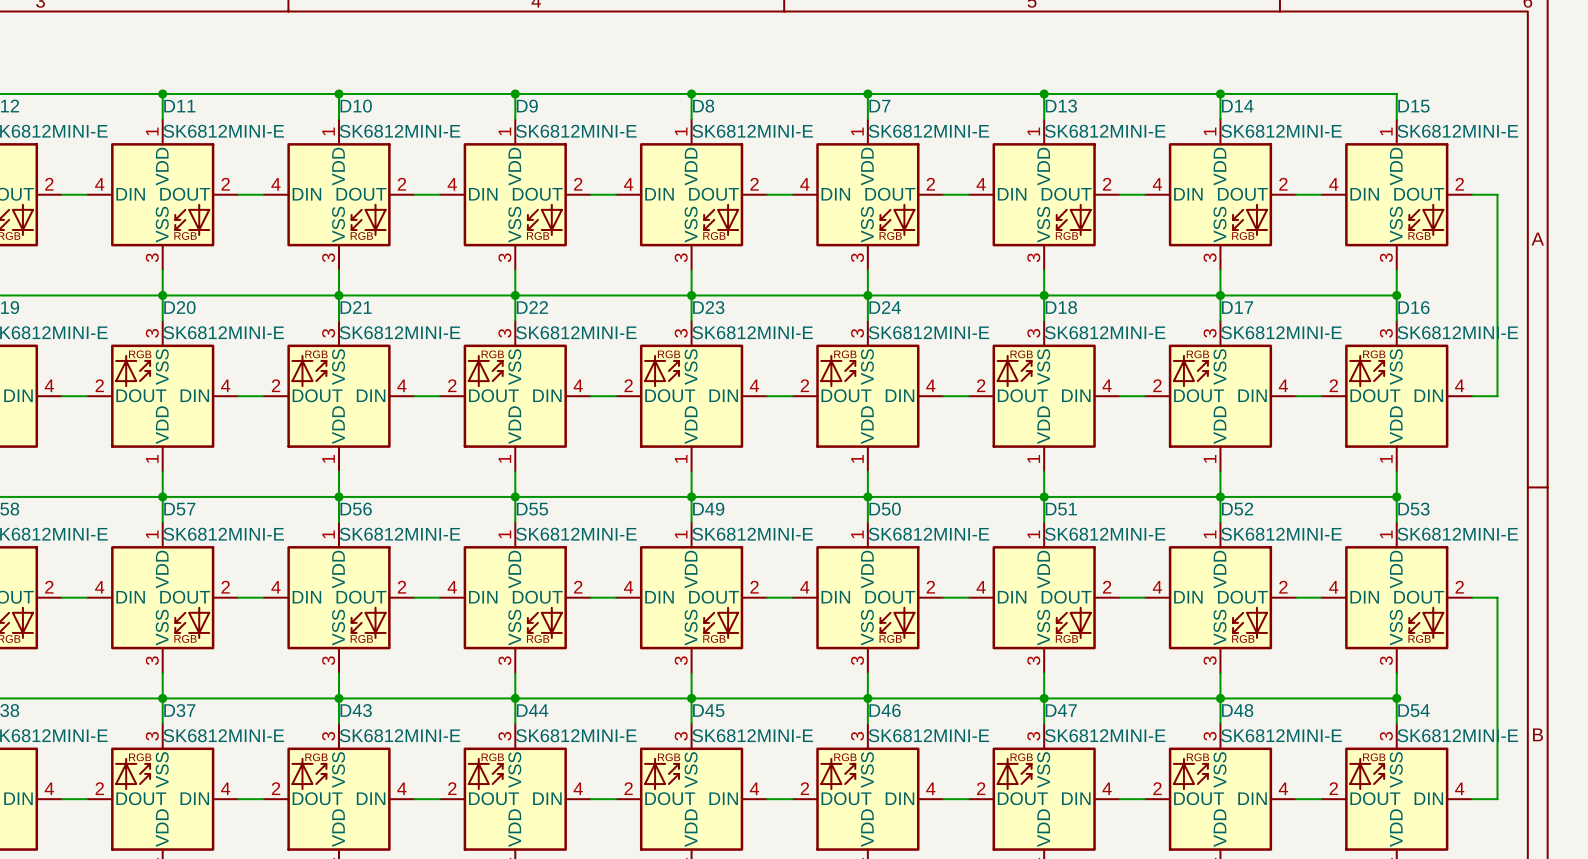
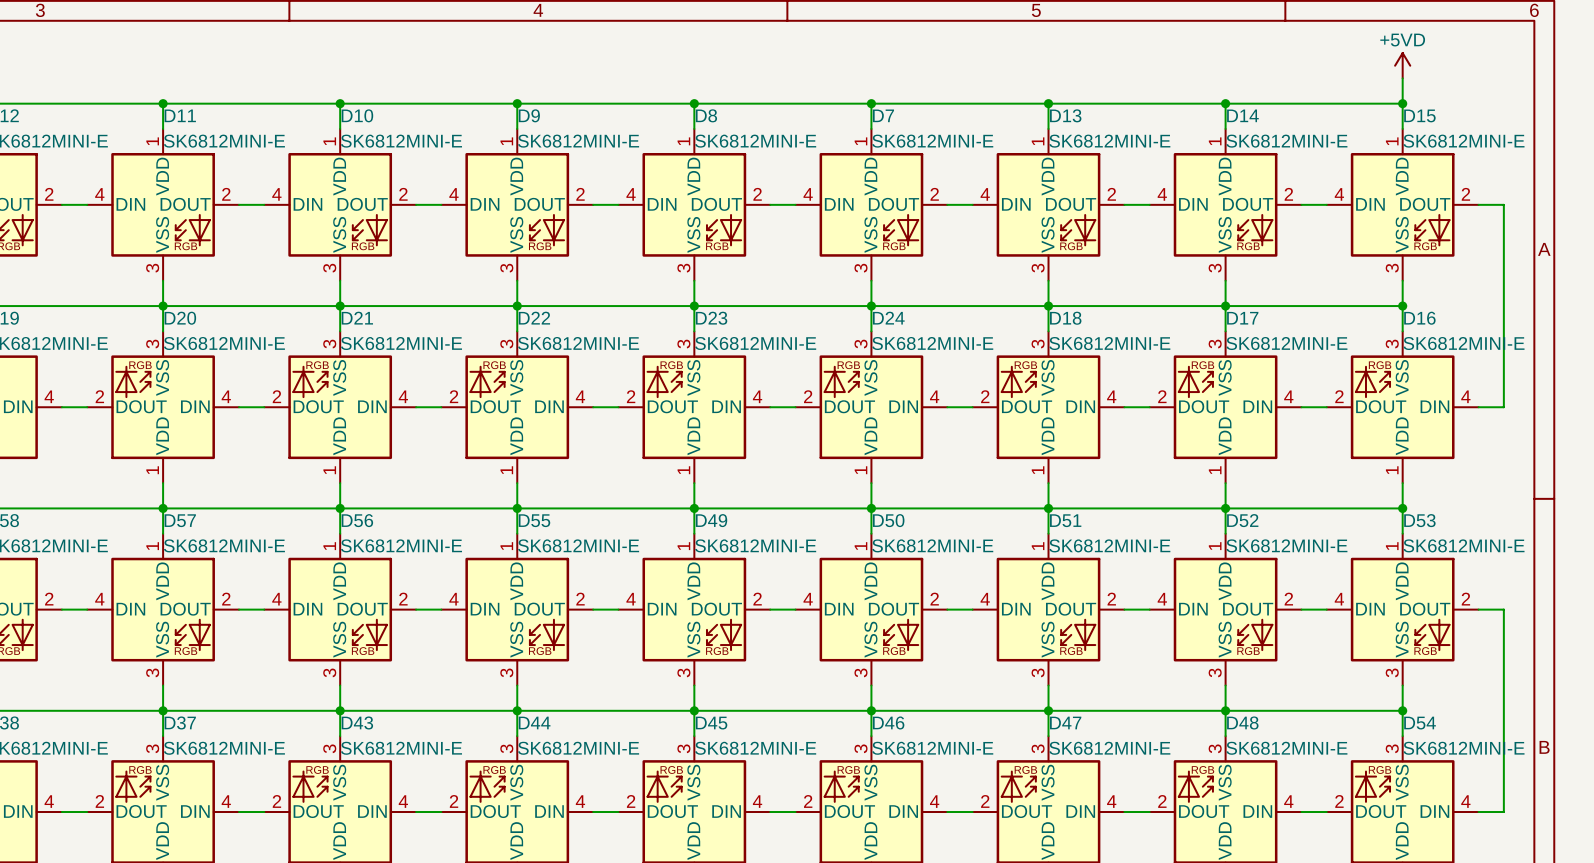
power symbol: none -> +5VD (1402, 65)
wire: none -> (1402, 78) (1402, 103)
junction: none -> (1402, 103)

